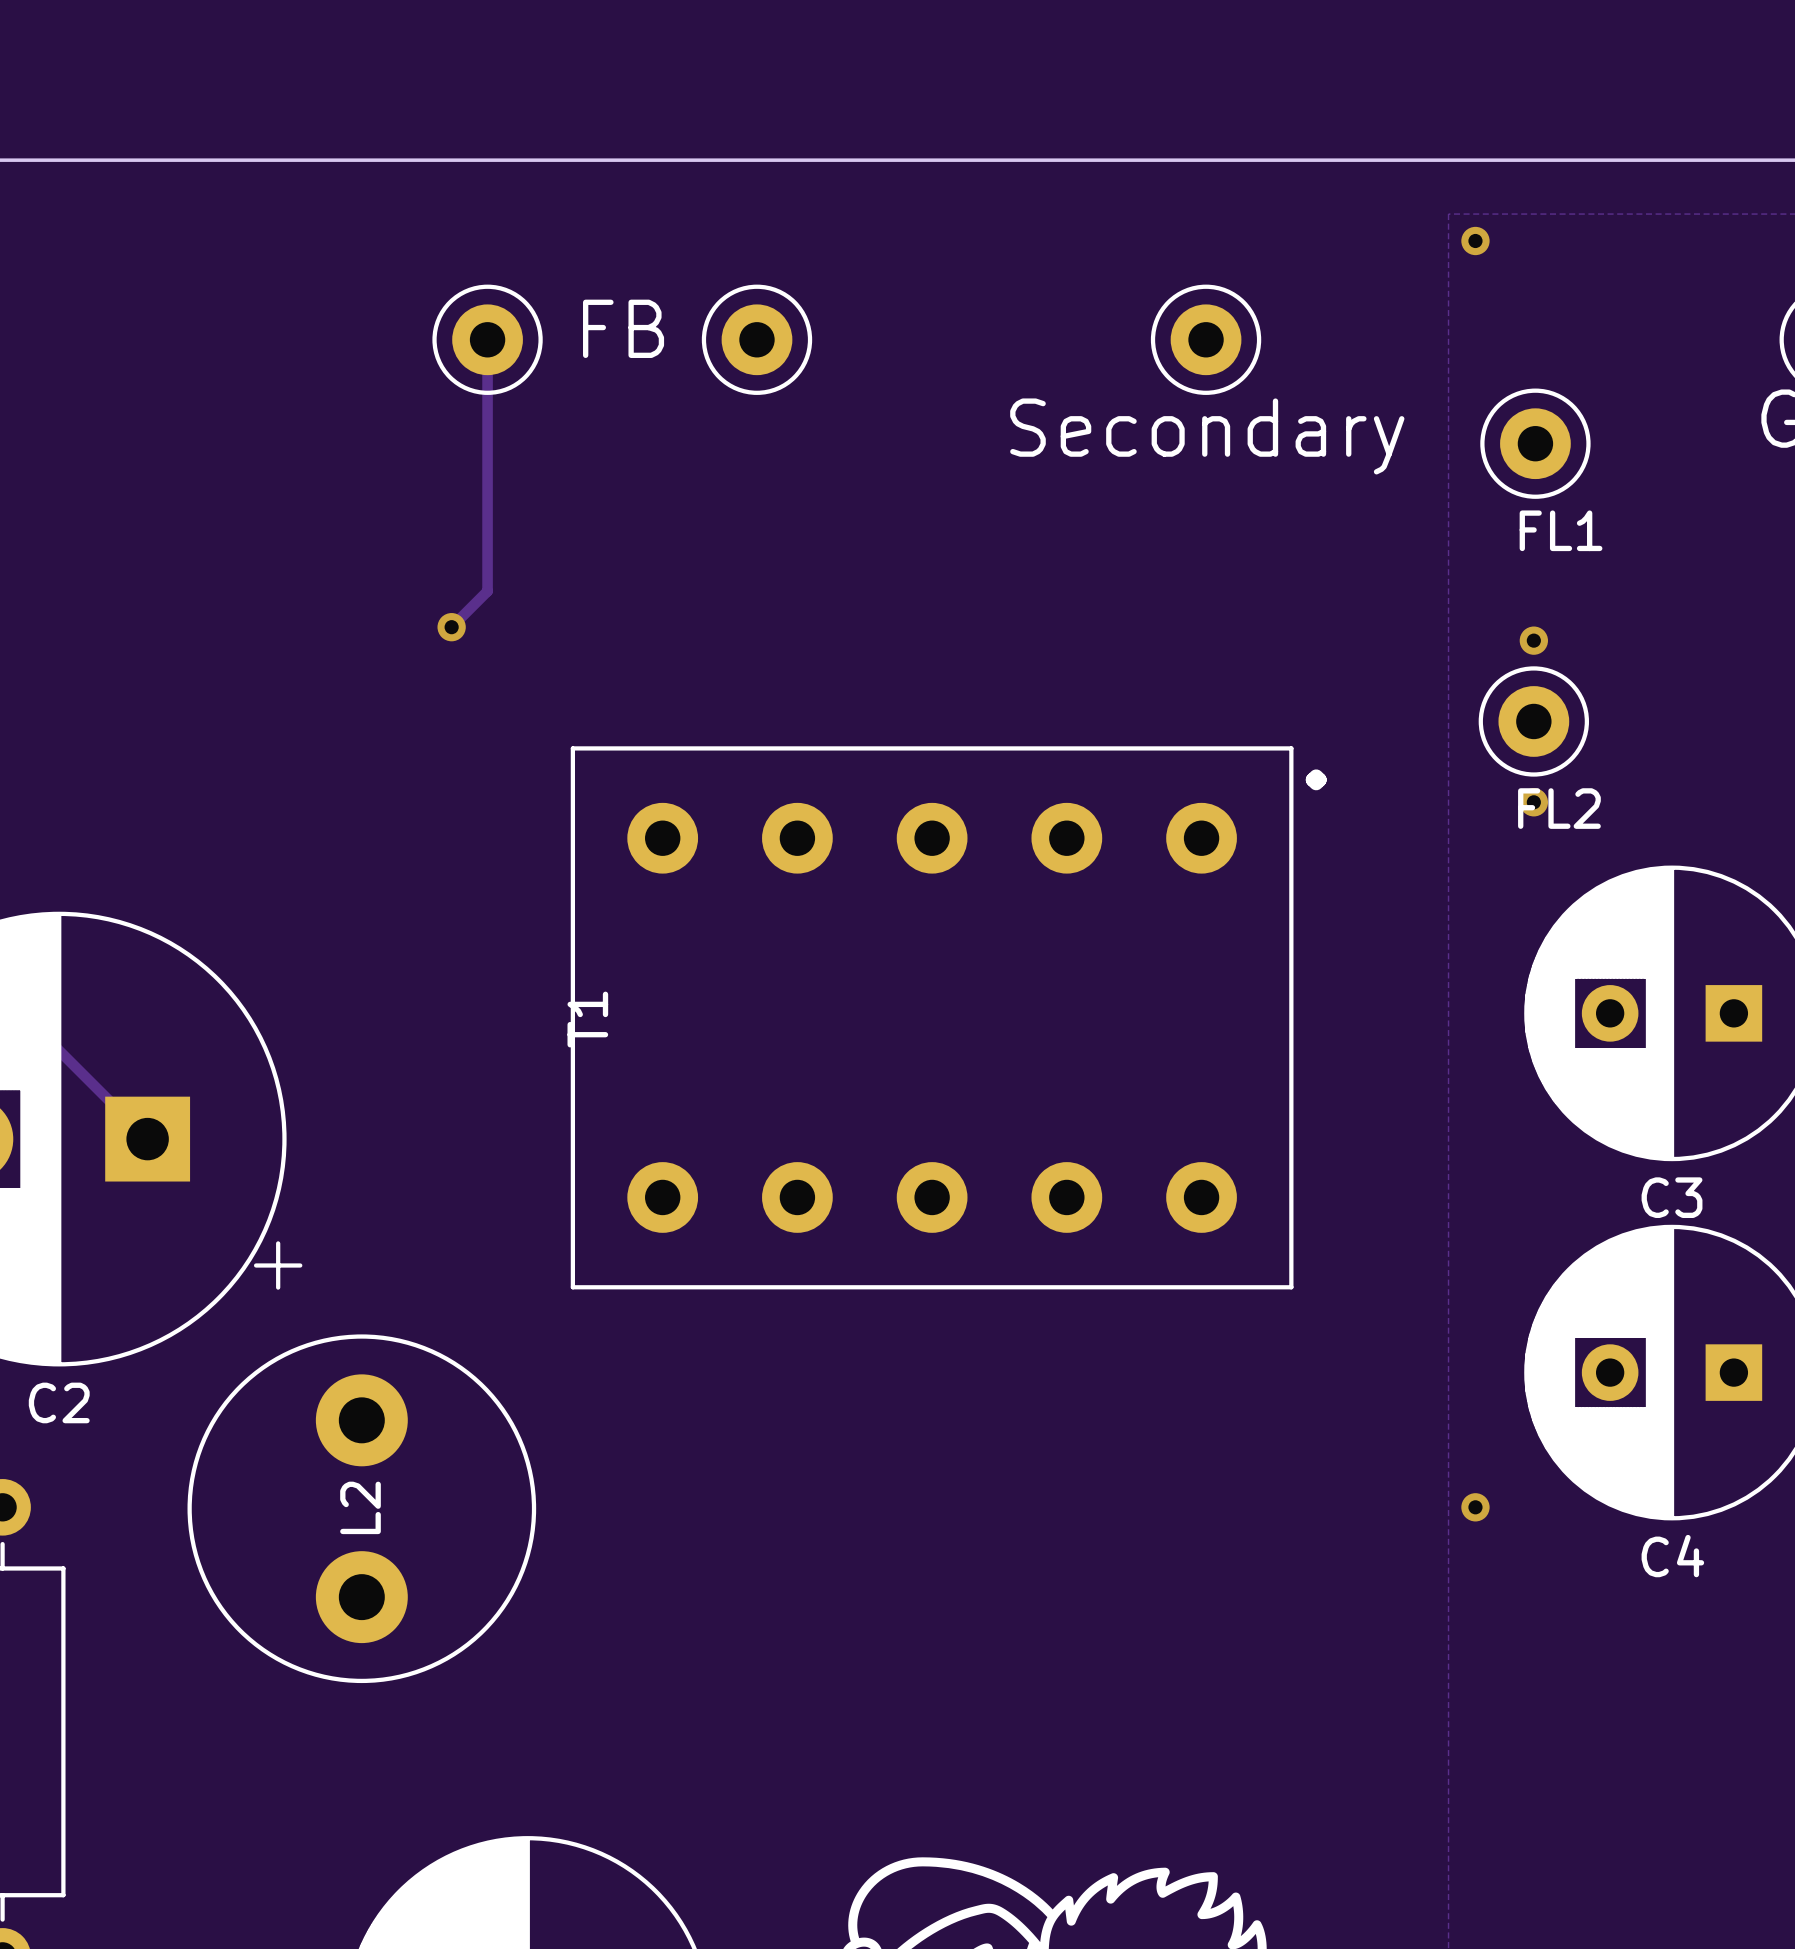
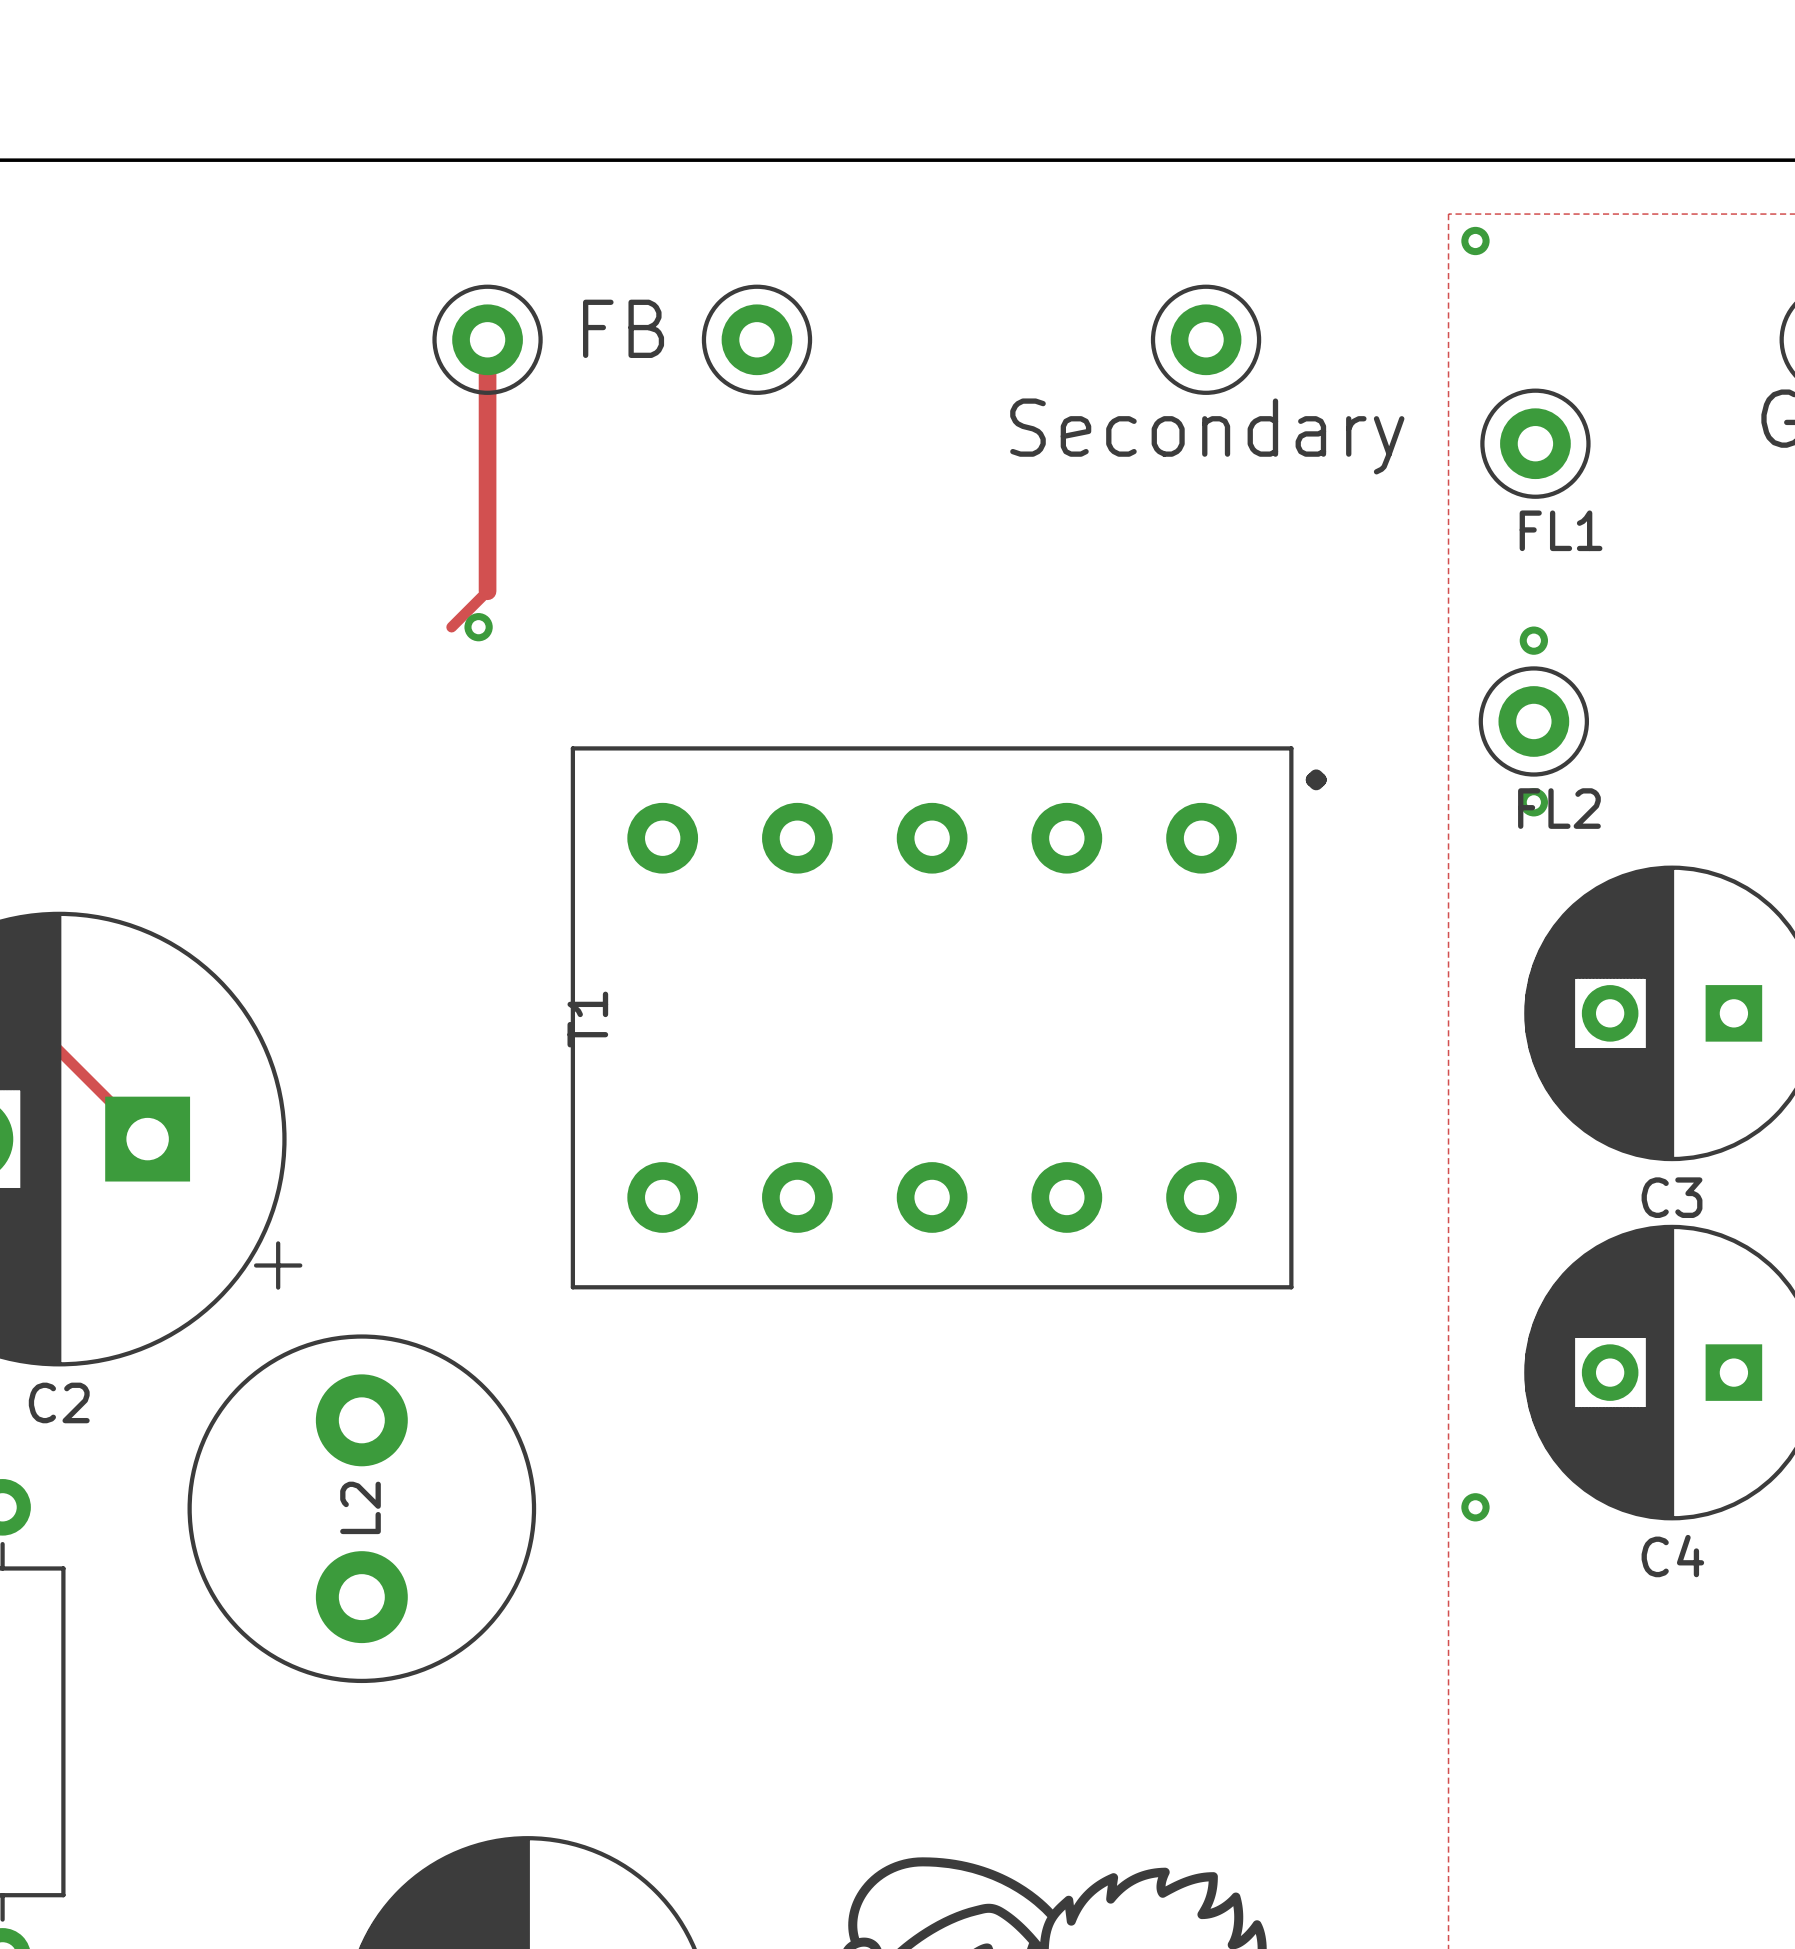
track width: thin (487, 339) (487, 591) -> thick (487, 339) (487, 591)
via position: (451, 627) -> (478, 627)

